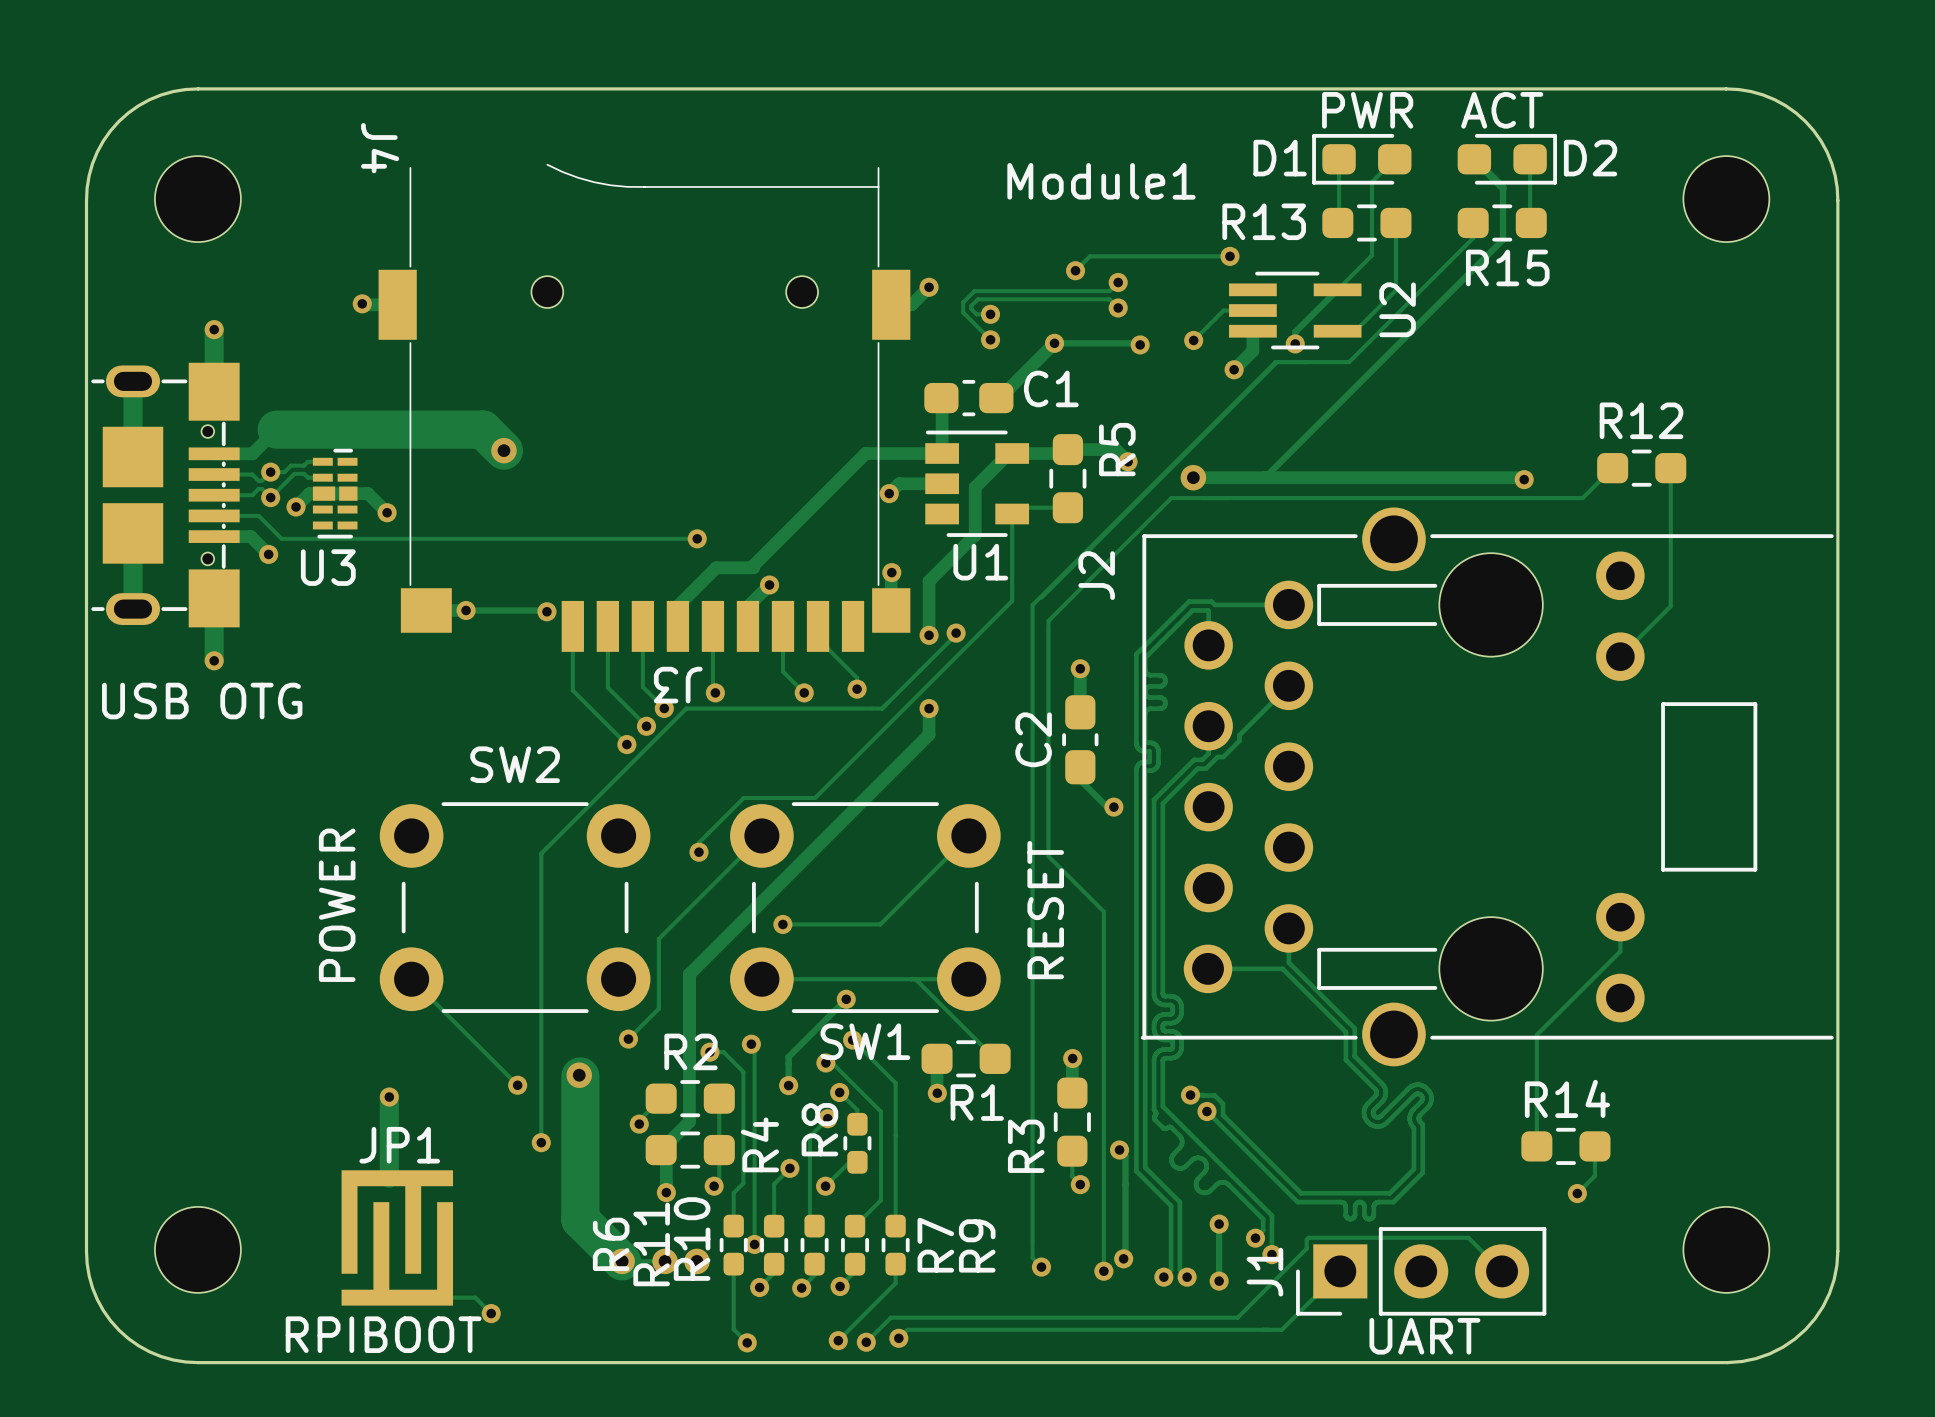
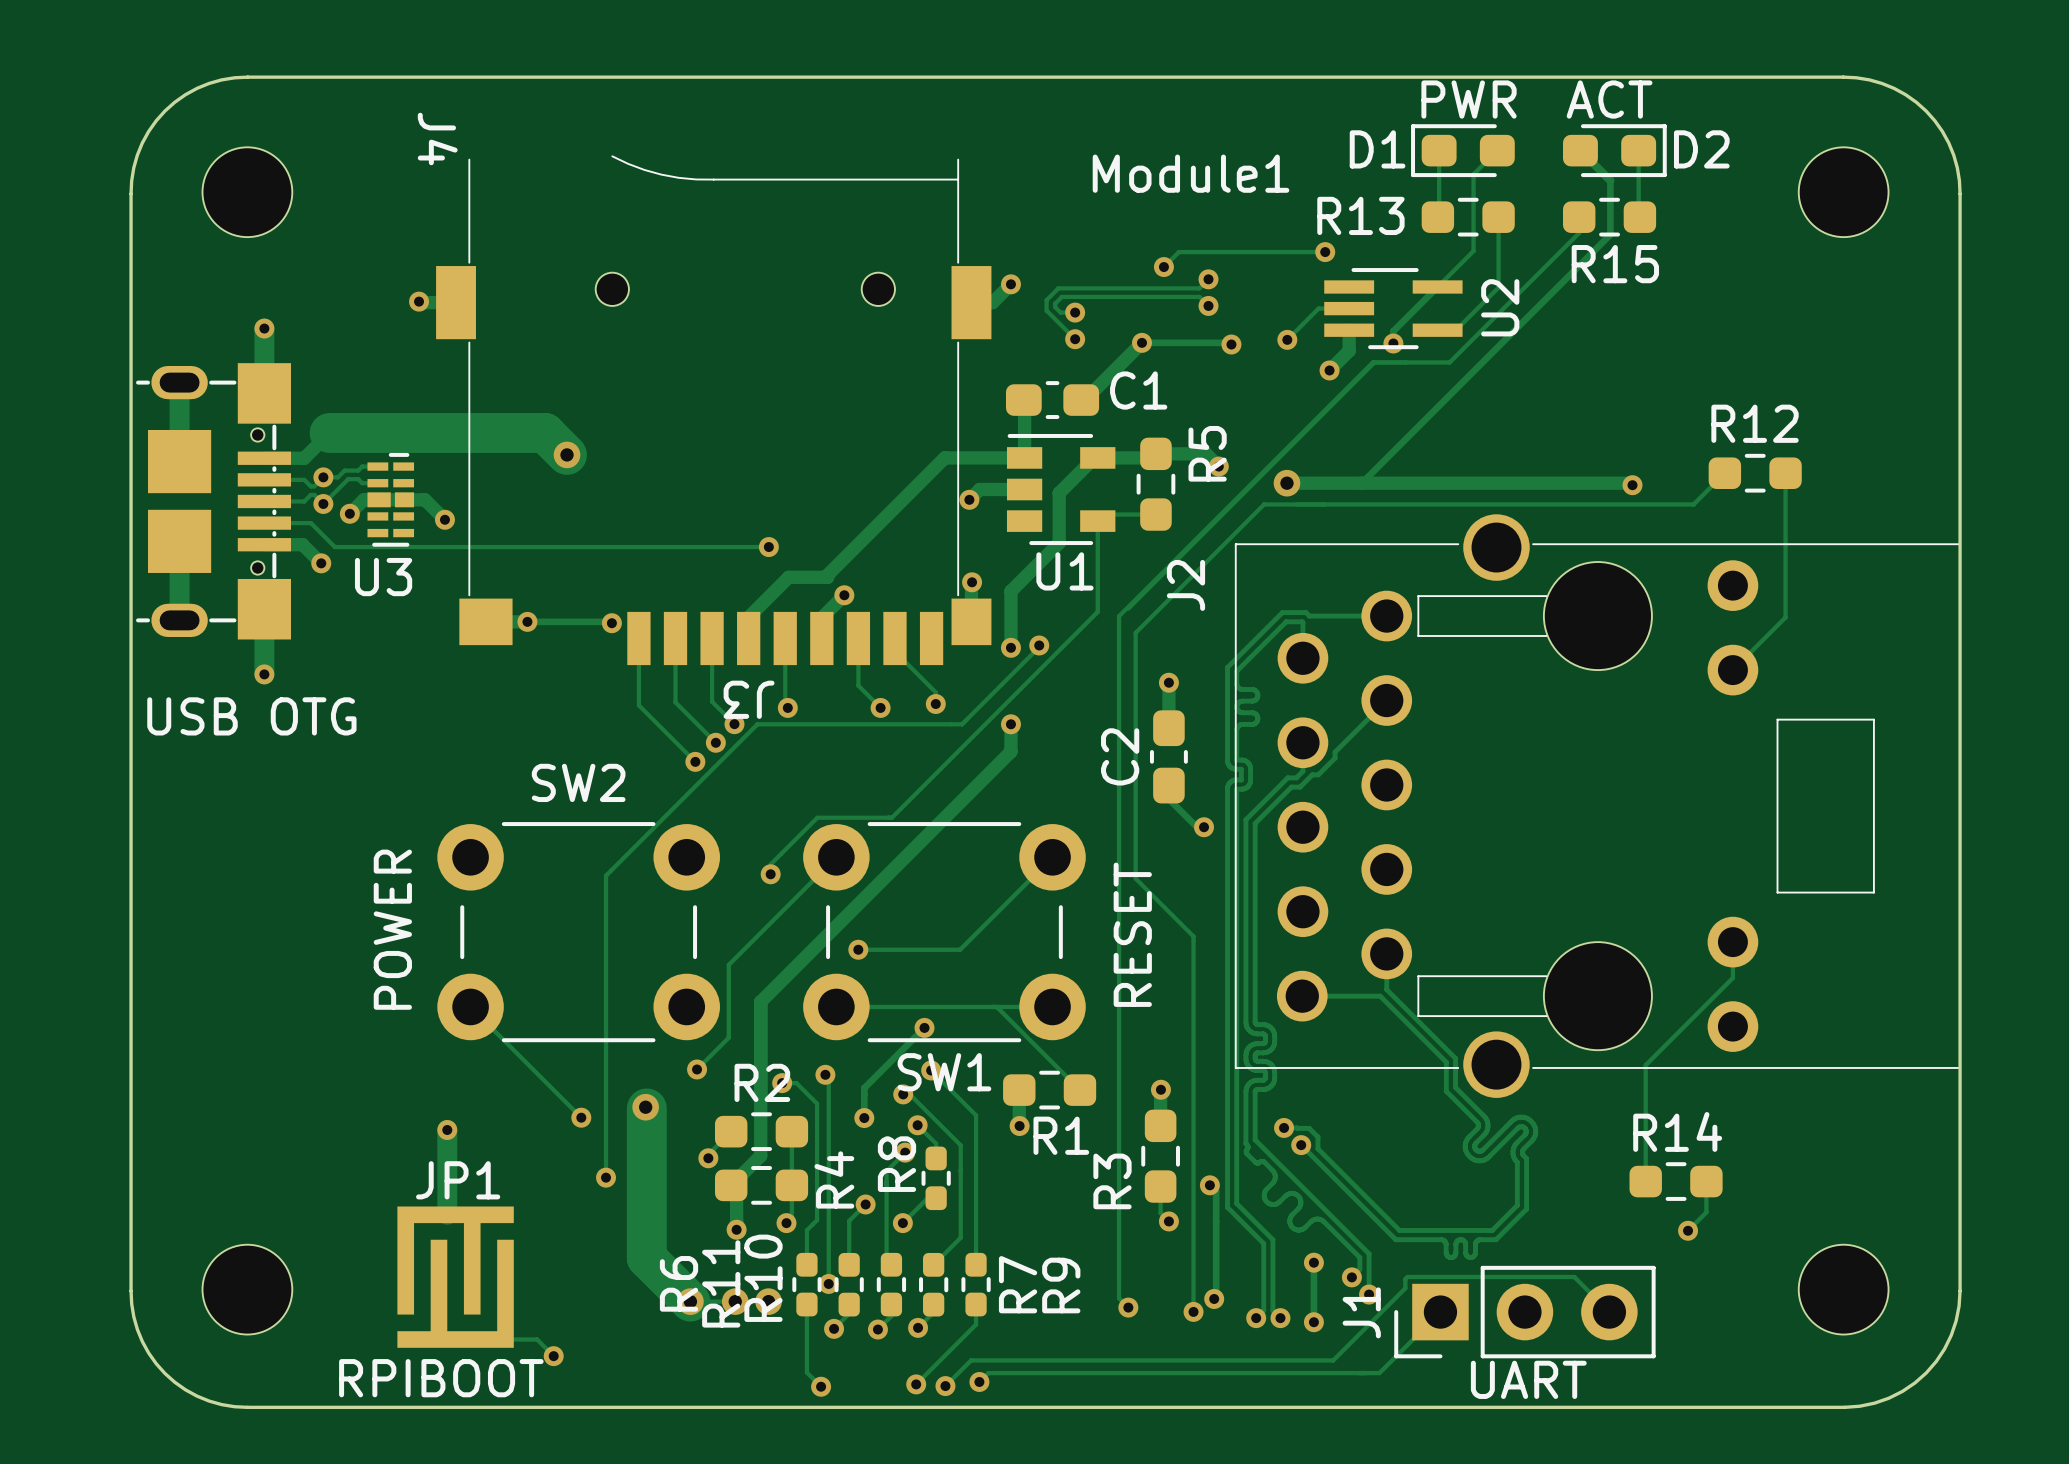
J2 footprint: [1140, 507, 1834, 1067] -> [1234, 514, 1961, 1098]

